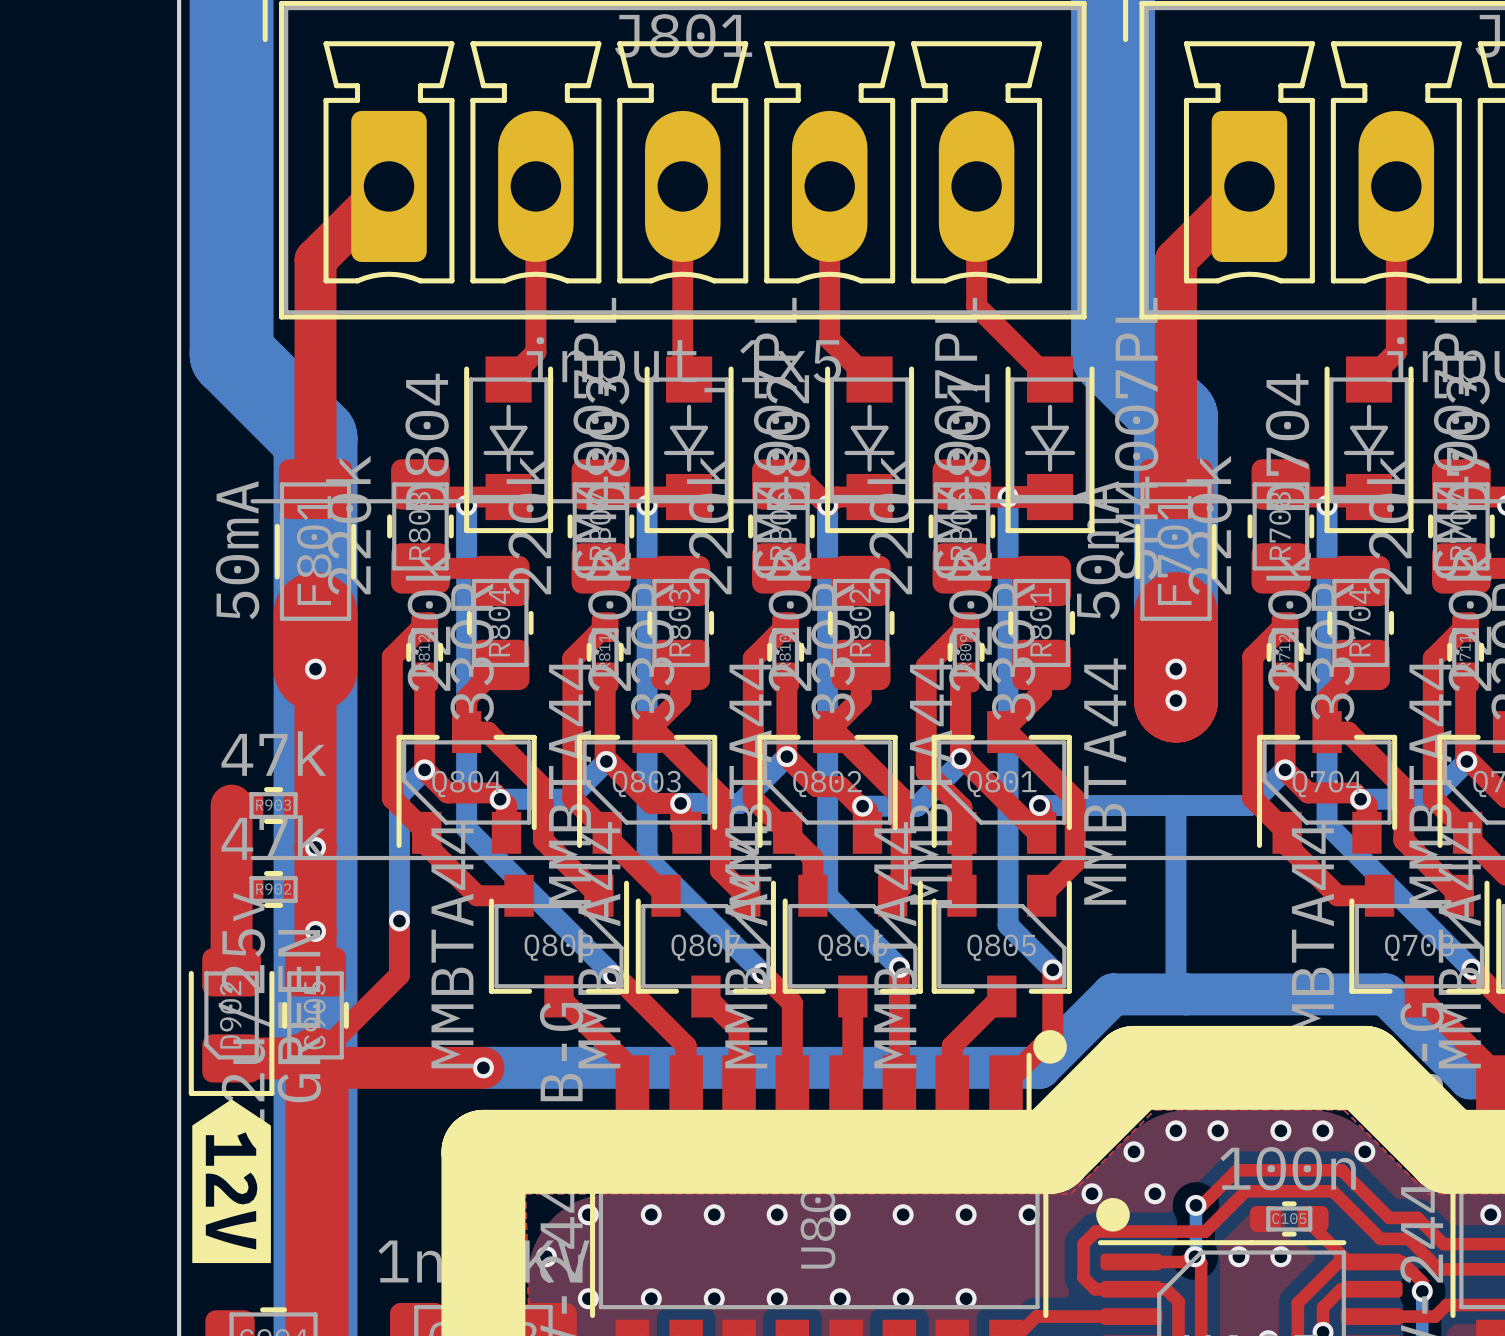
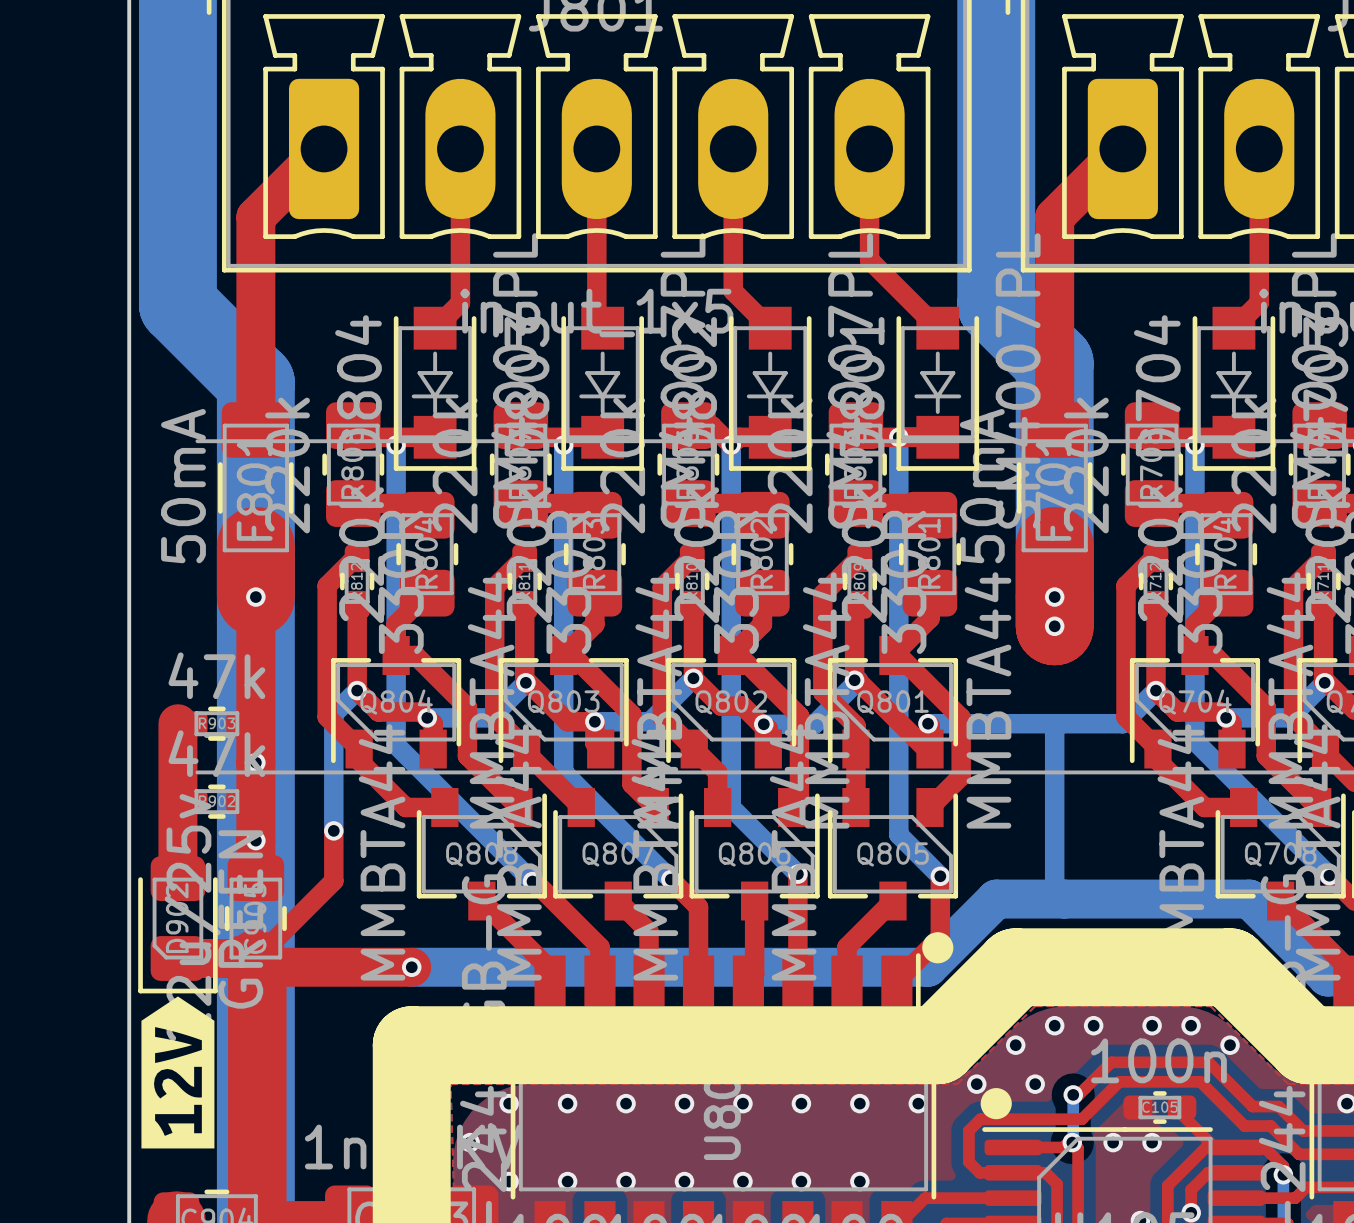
drawing shape: [192, 1099, 271, 1264] -> [141, 996, 215, 1149]

